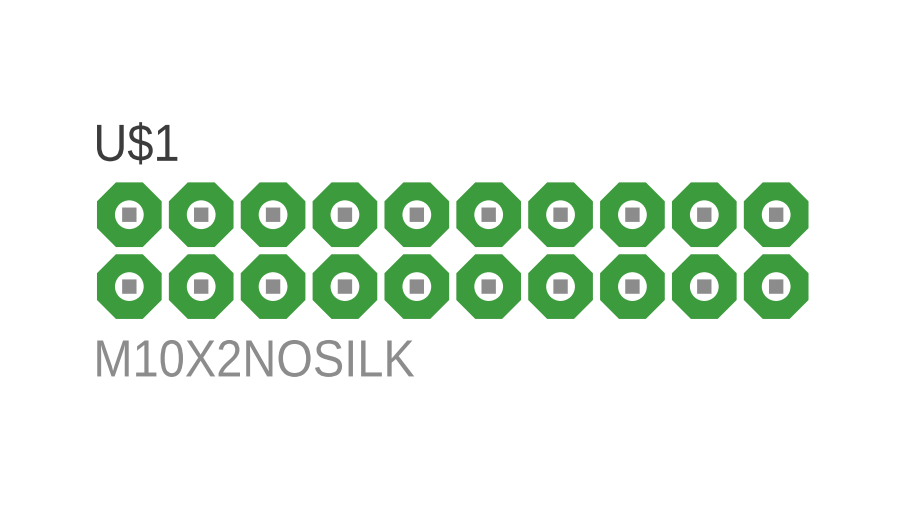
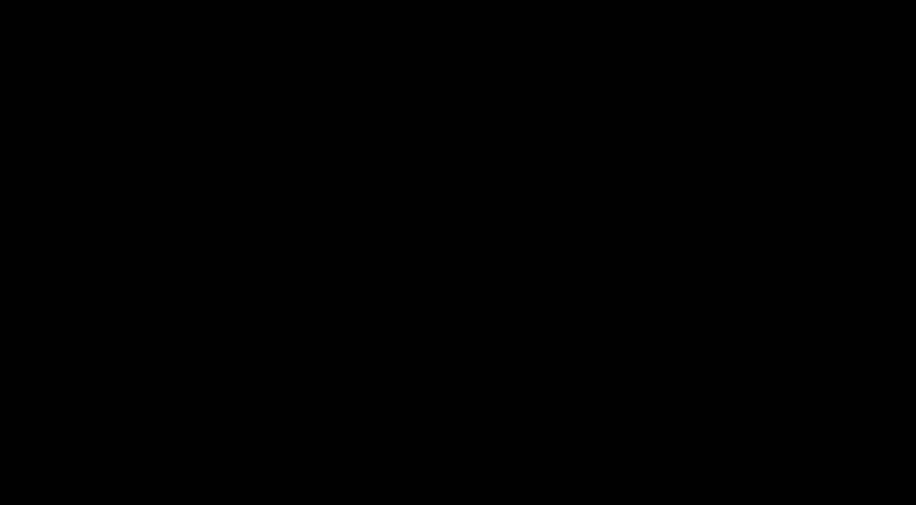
U$1: M10X2NOSILK (452, 250) -> none

